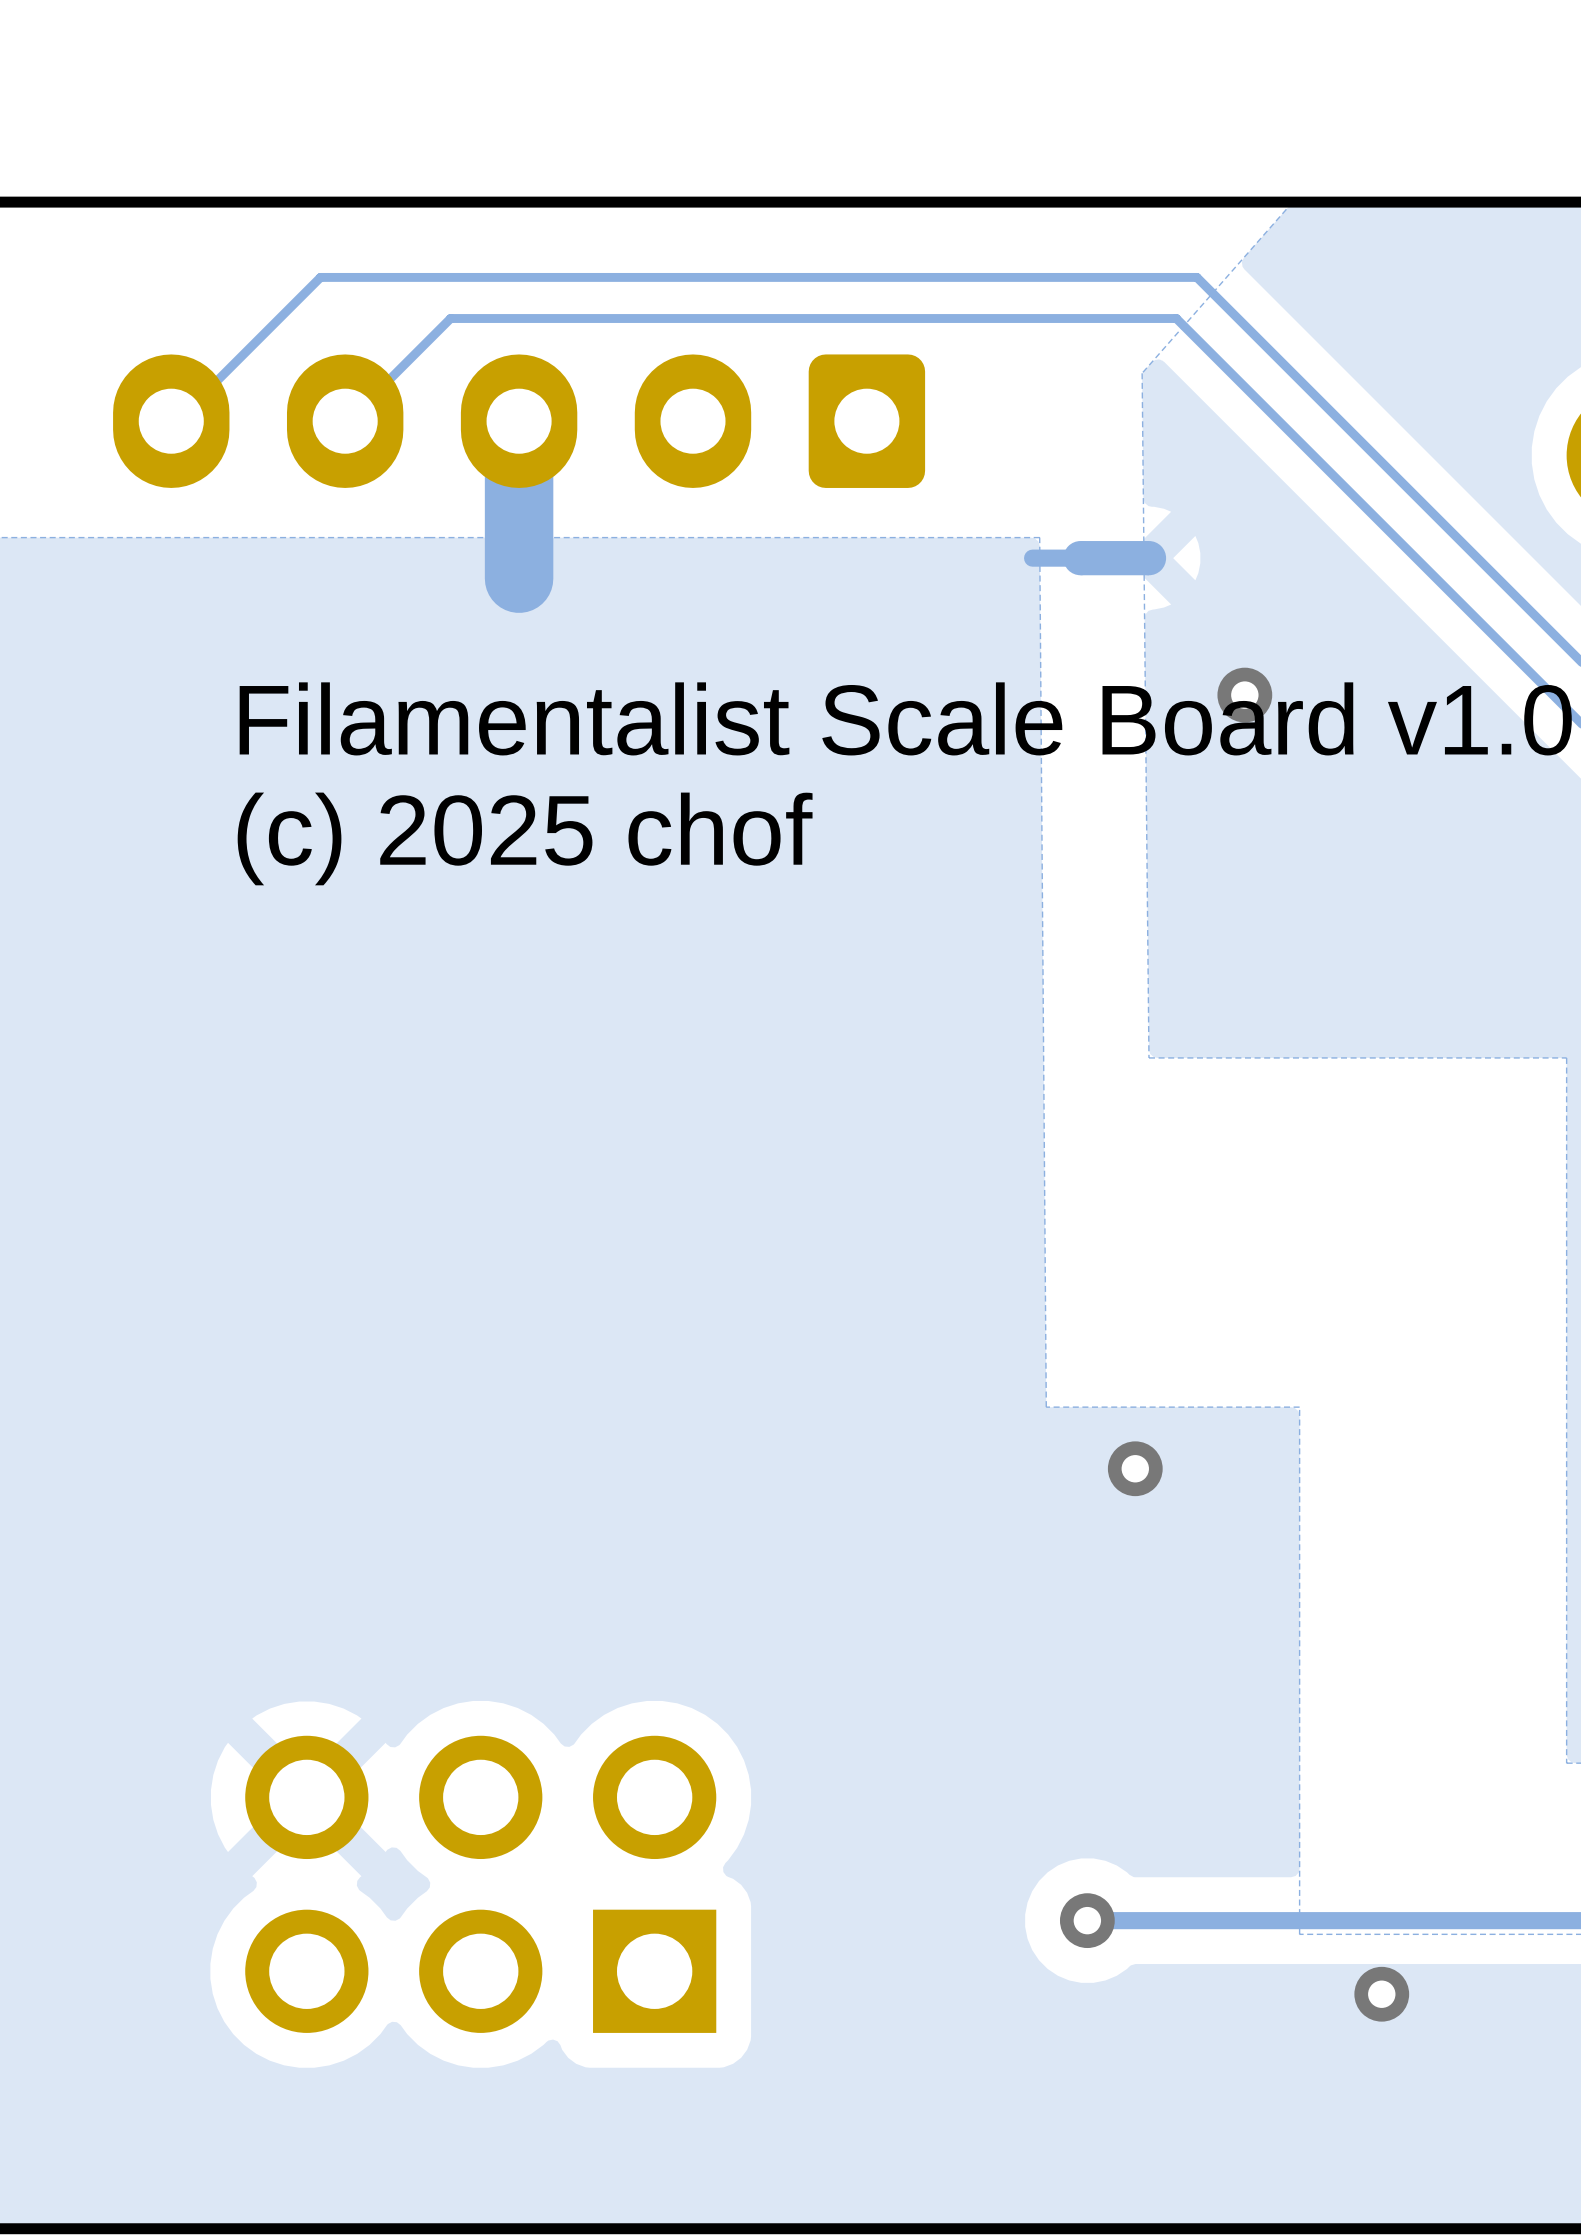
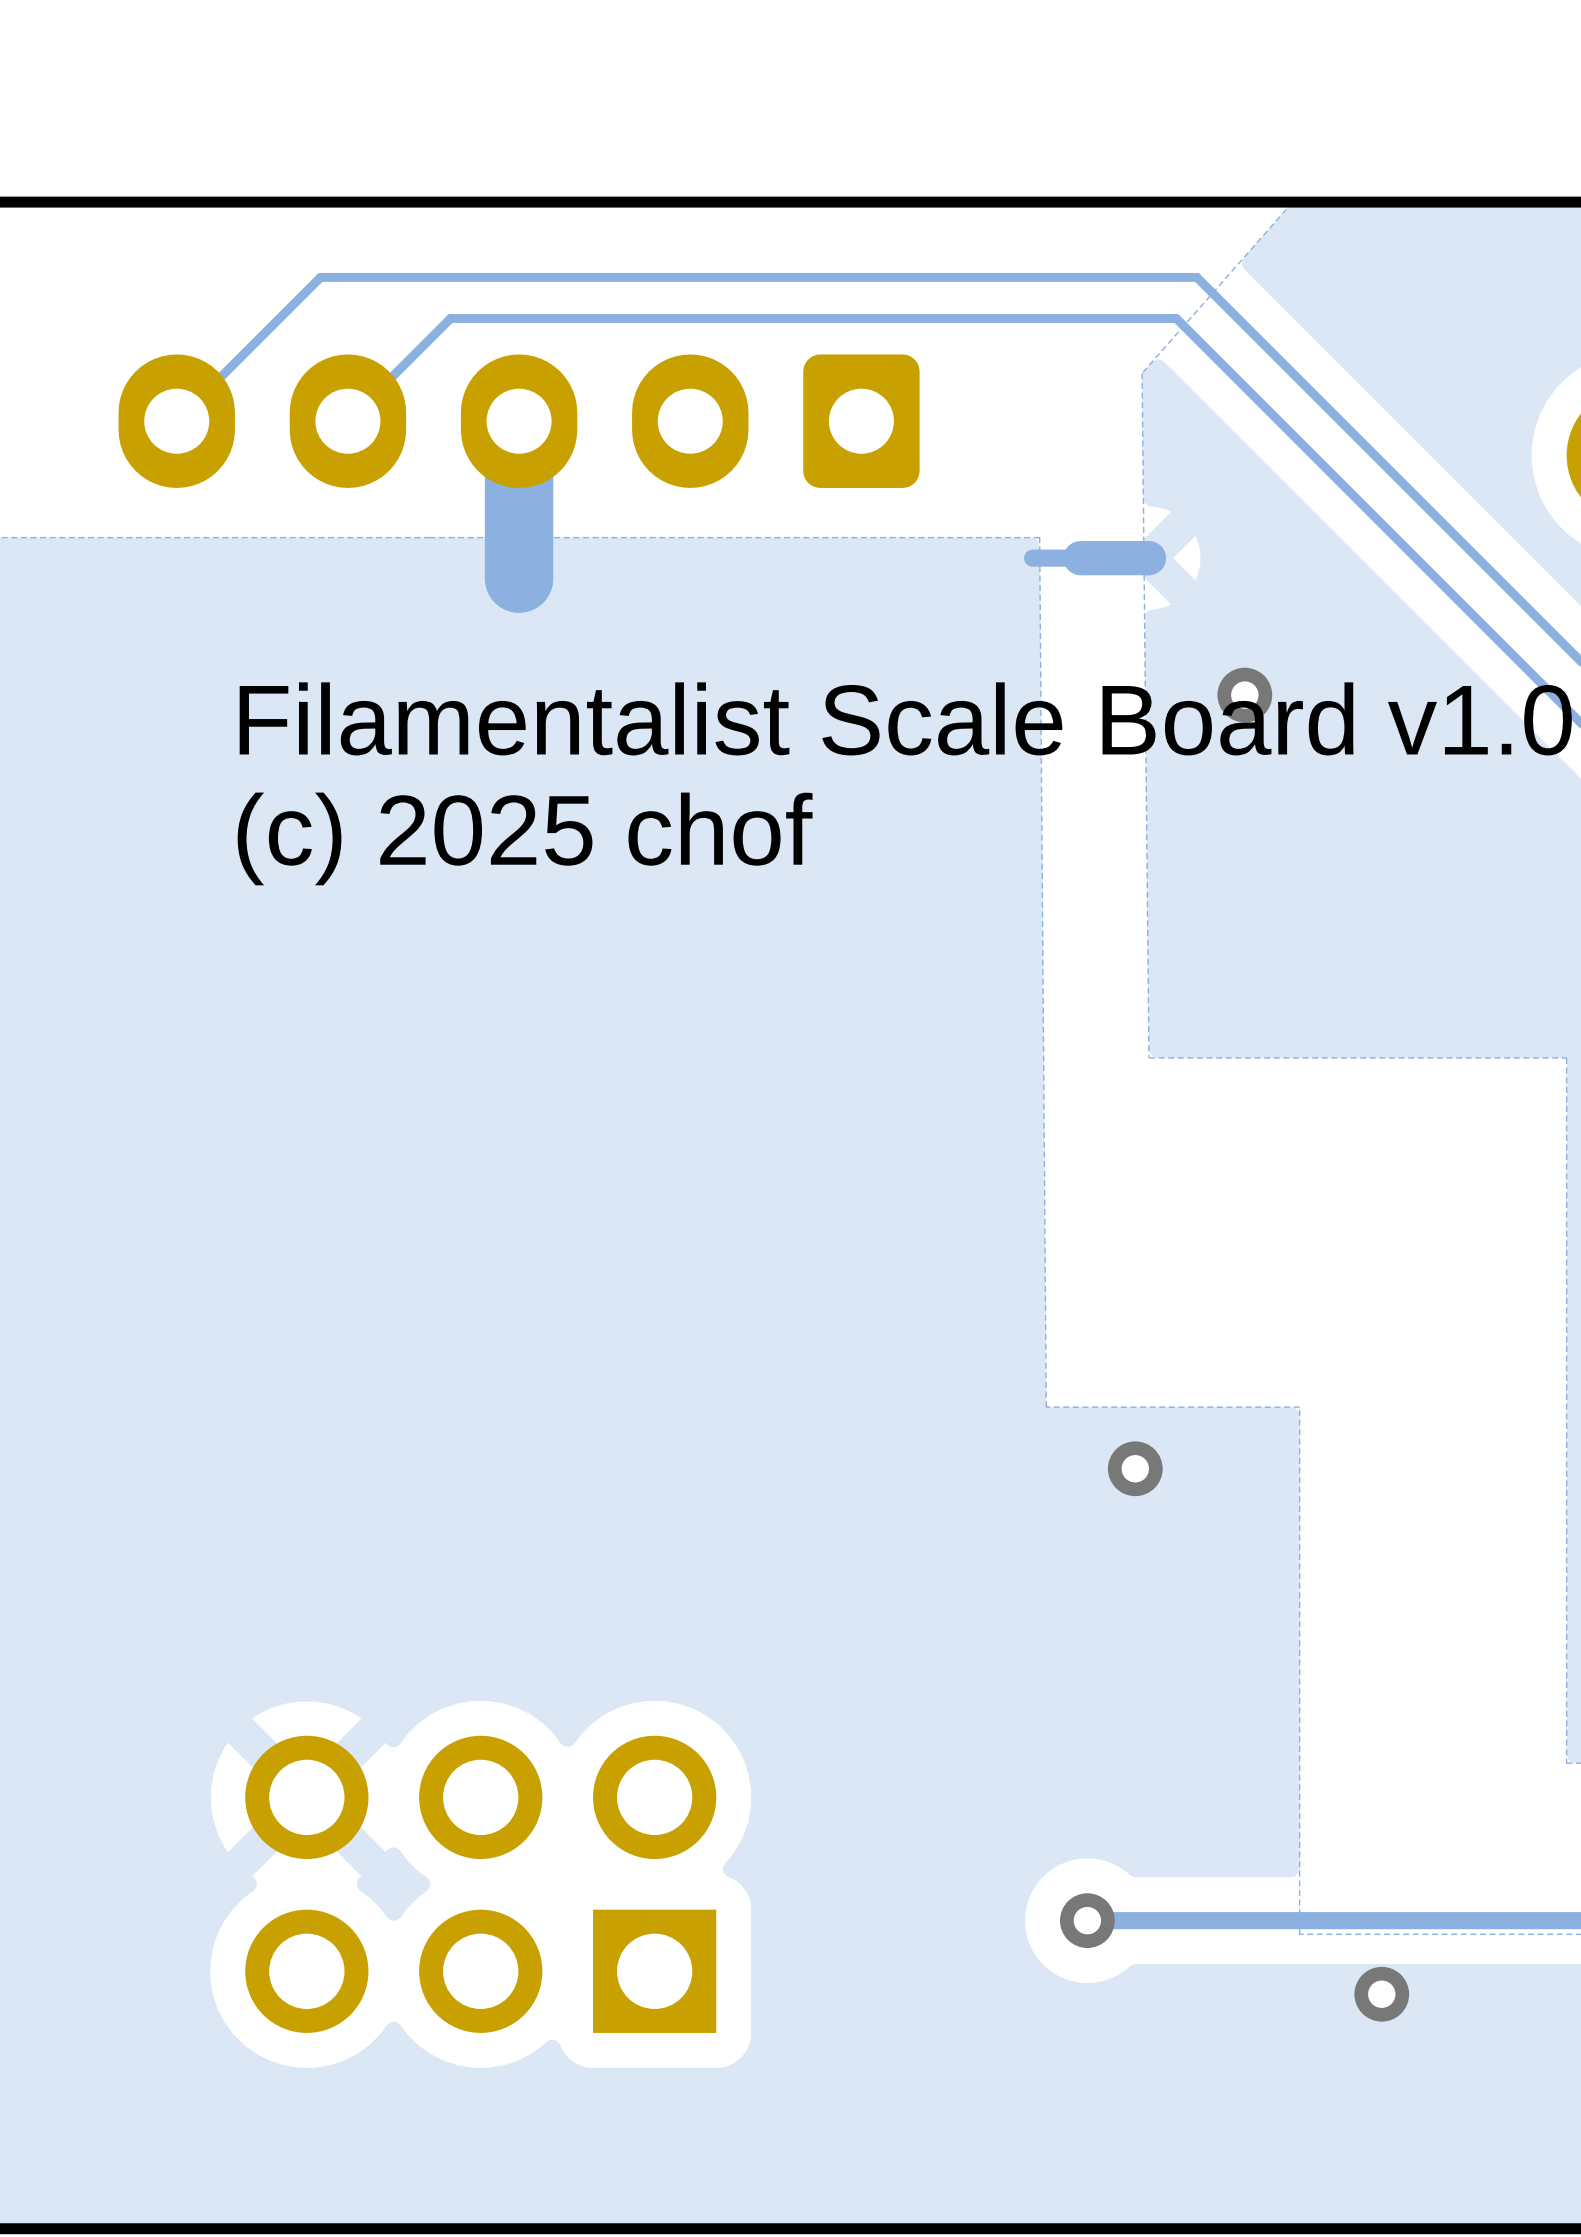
part footprint: [113, 354, 926, 488] -> [118, 354, 920, 488]

